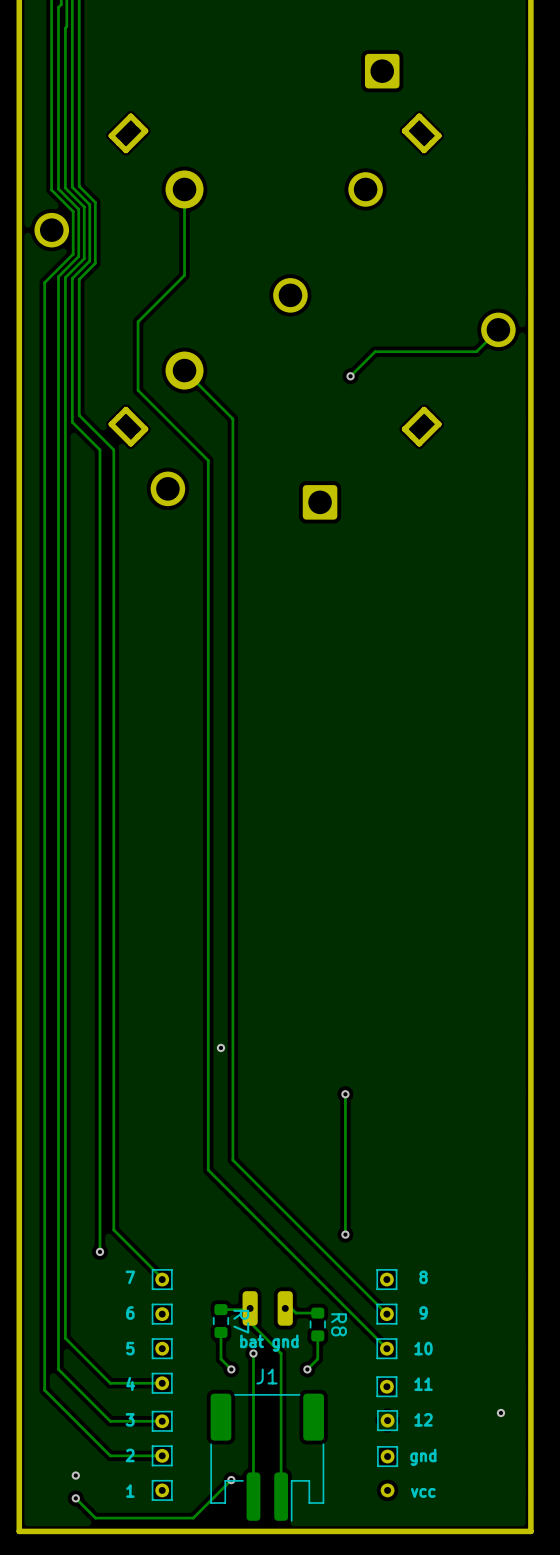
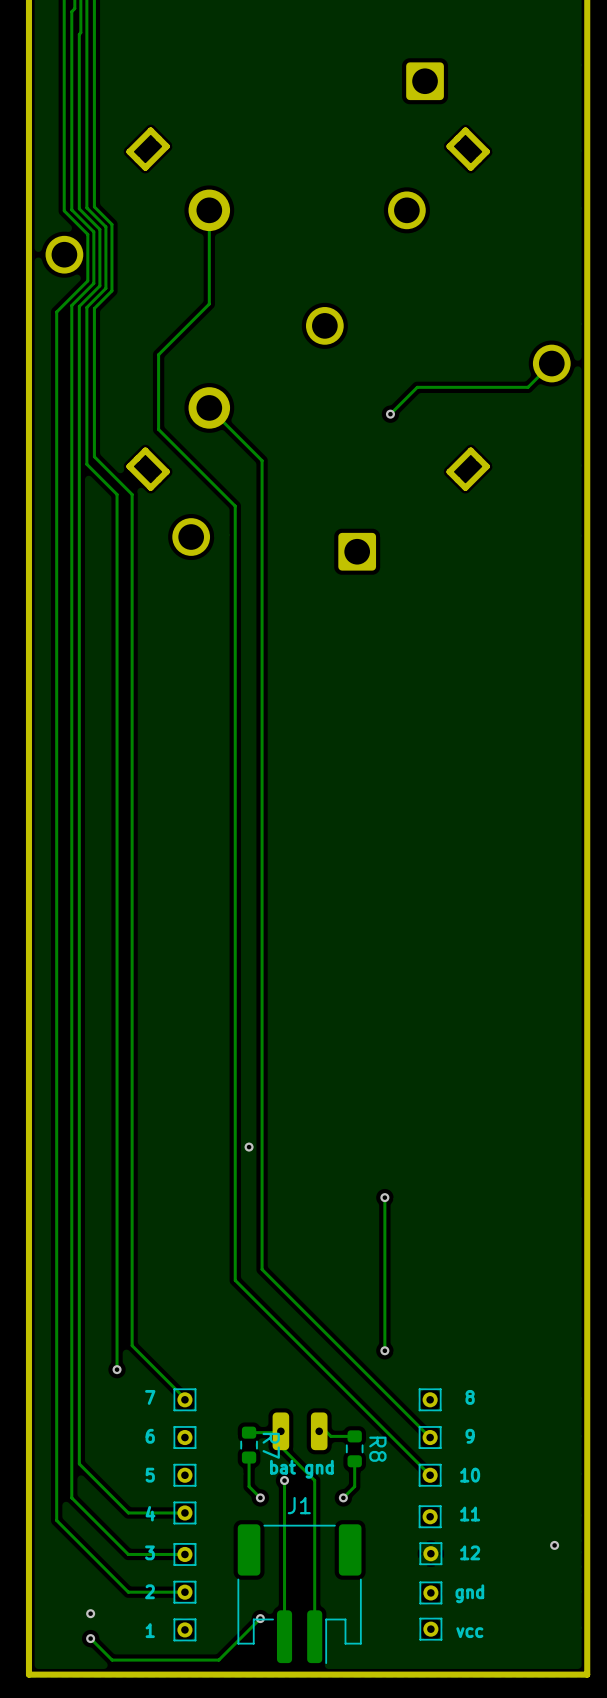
part side: top (387, 1490) -> bottom (430, 1629)

